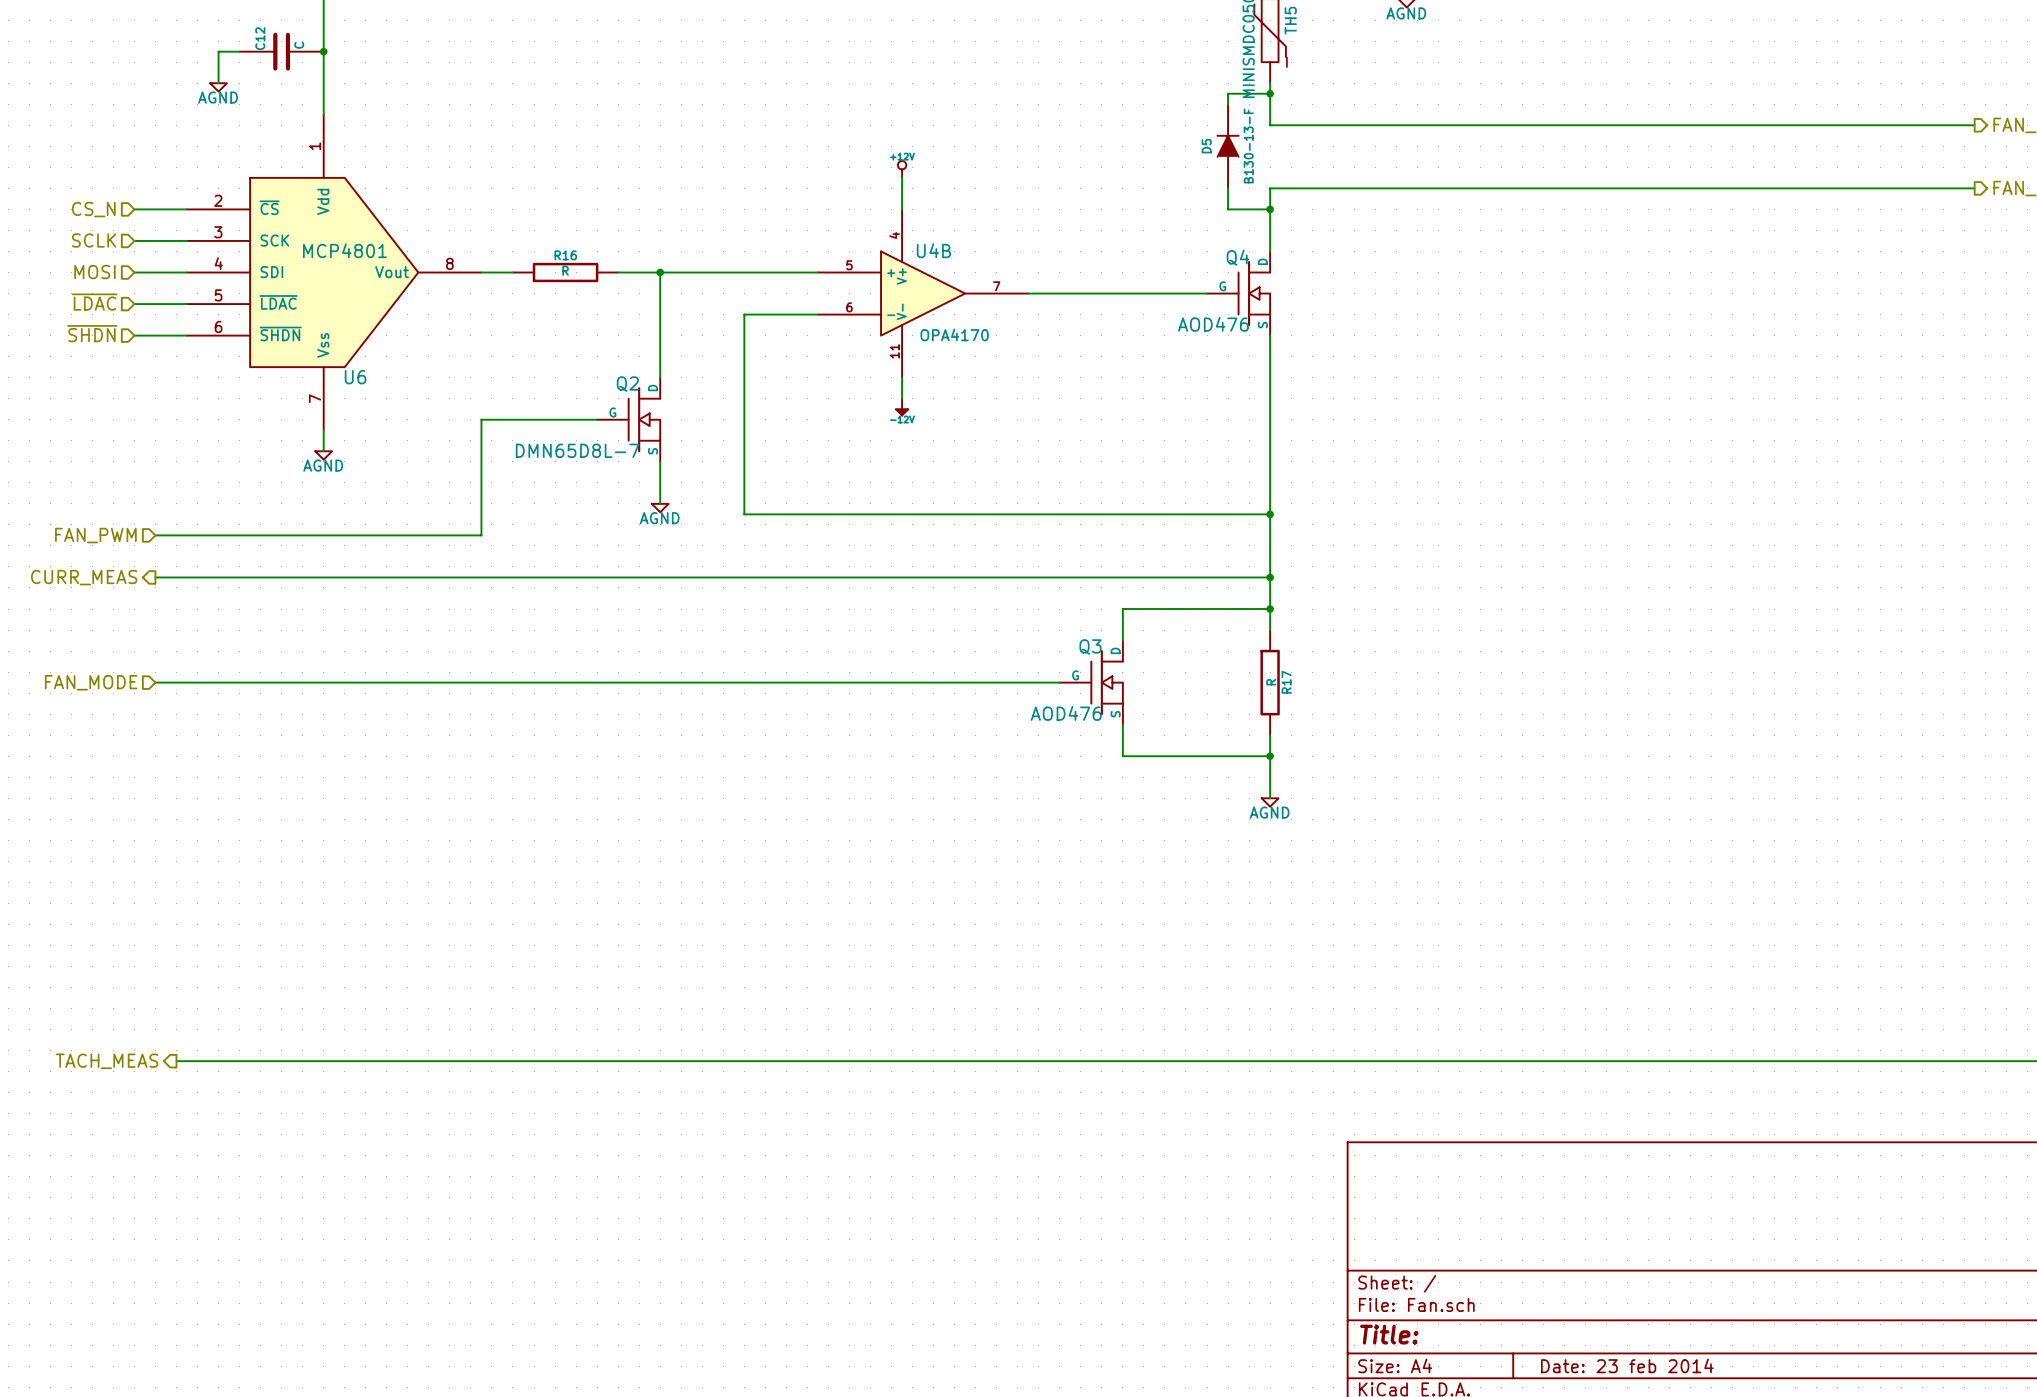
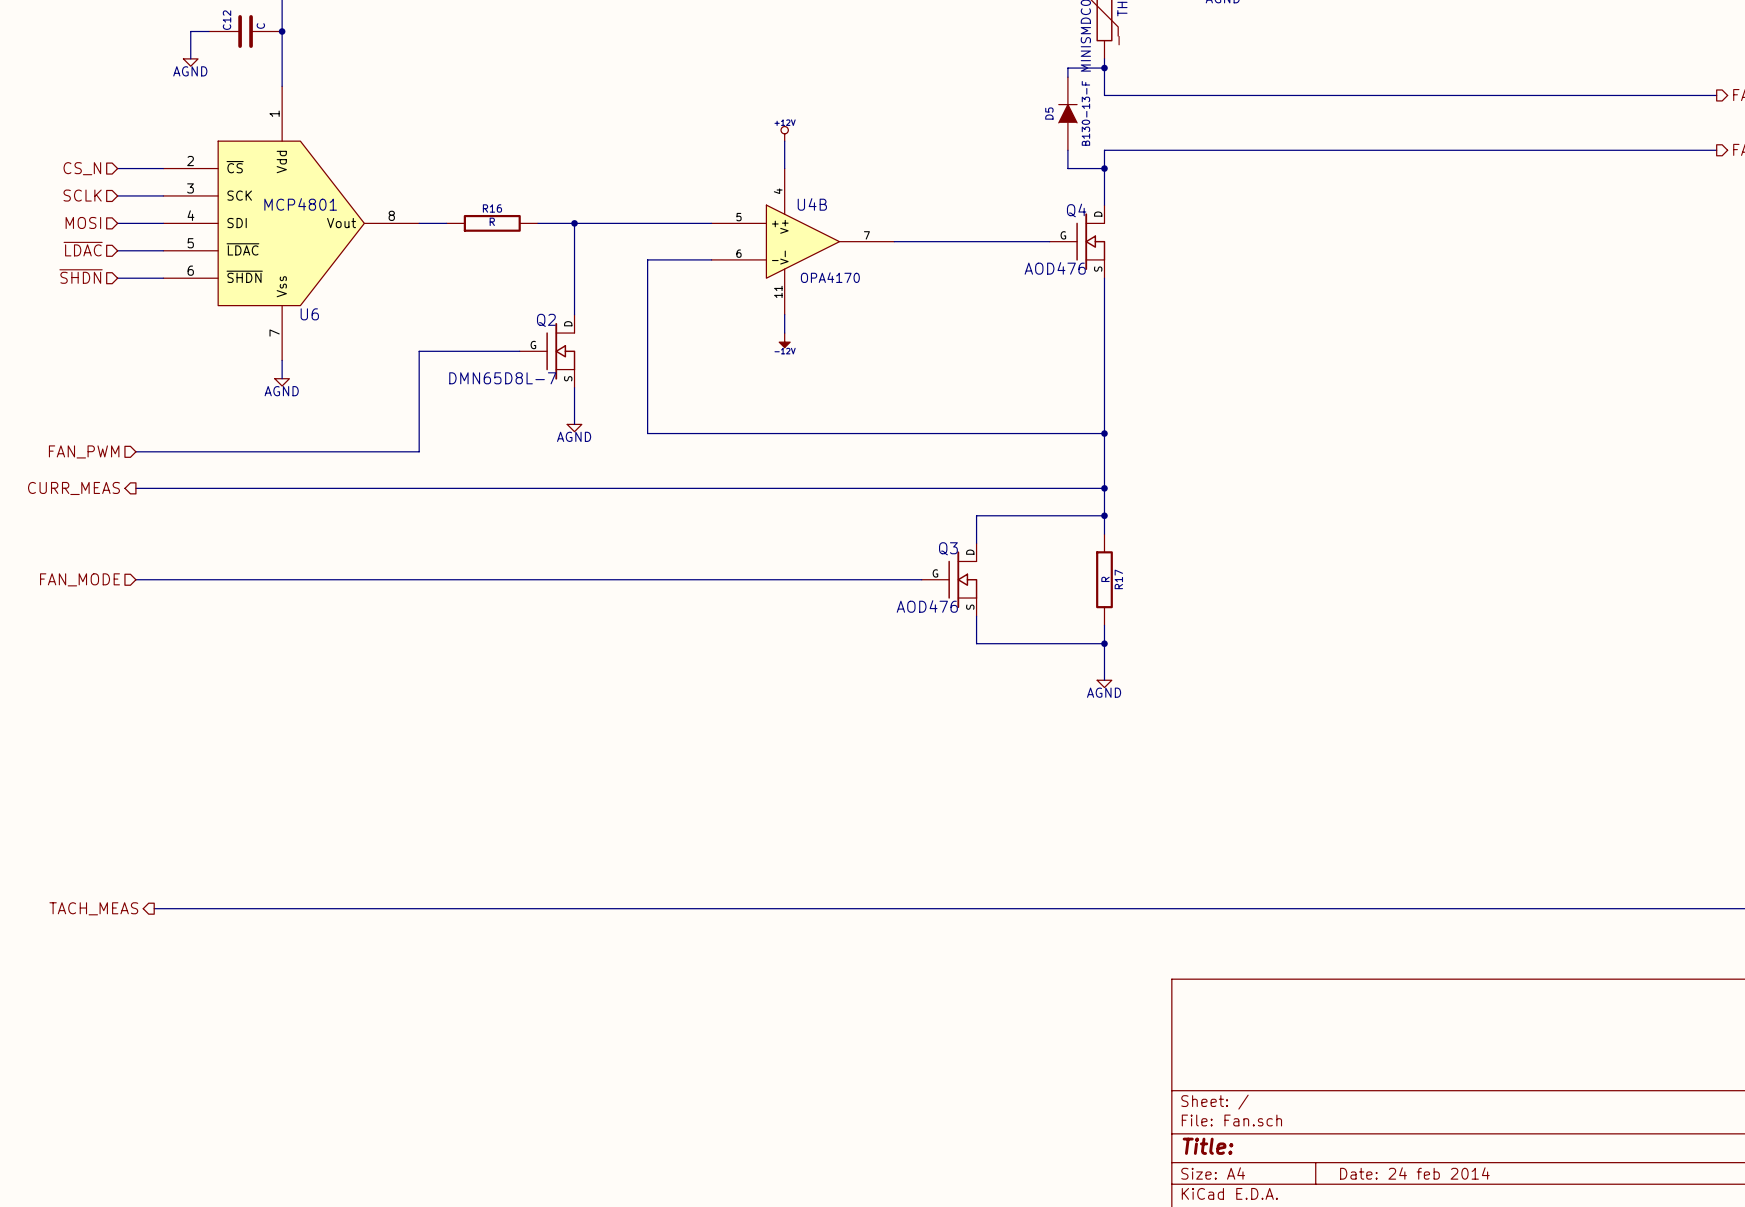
title block: Date: 23 feb 2014 (1627, 1365) -> Date: 24 feb 2014 (1414, 1173)

